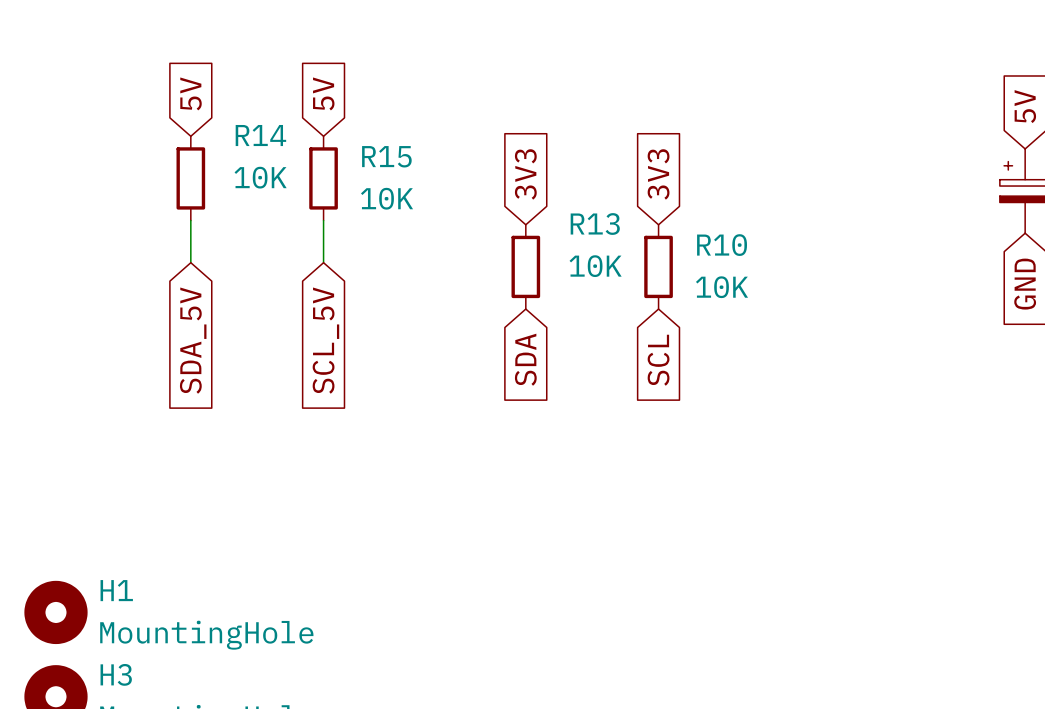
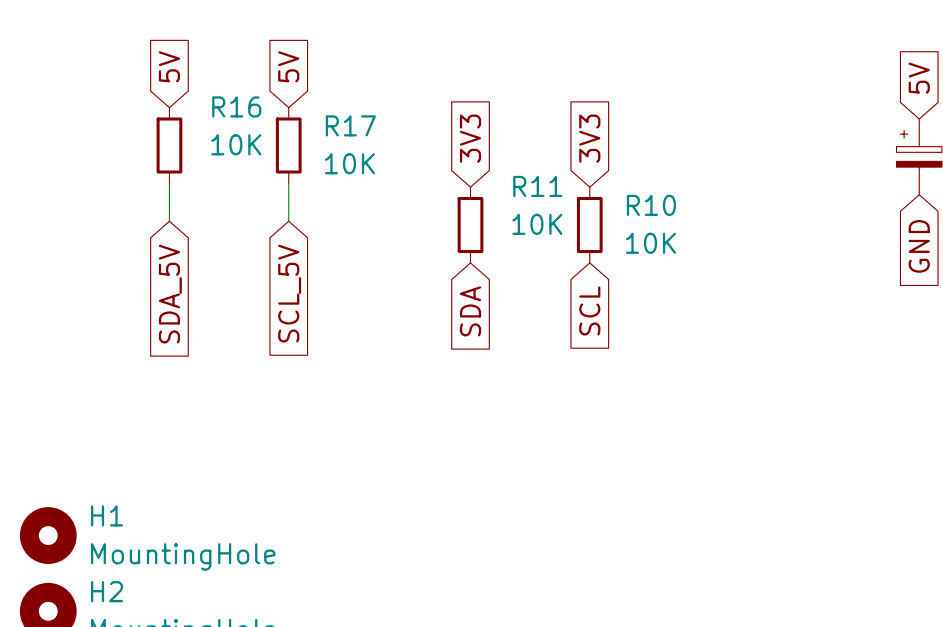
R14 name: R14 (260, 135) -> R16 (236, 106)
R15 name: R15 (386, 156) -> R17 (350, 125)
R13 name: R13 (595, 224) -> R11 (537, 186)
H3 name: H3 (116, 674) -> H2 (107, 591)

